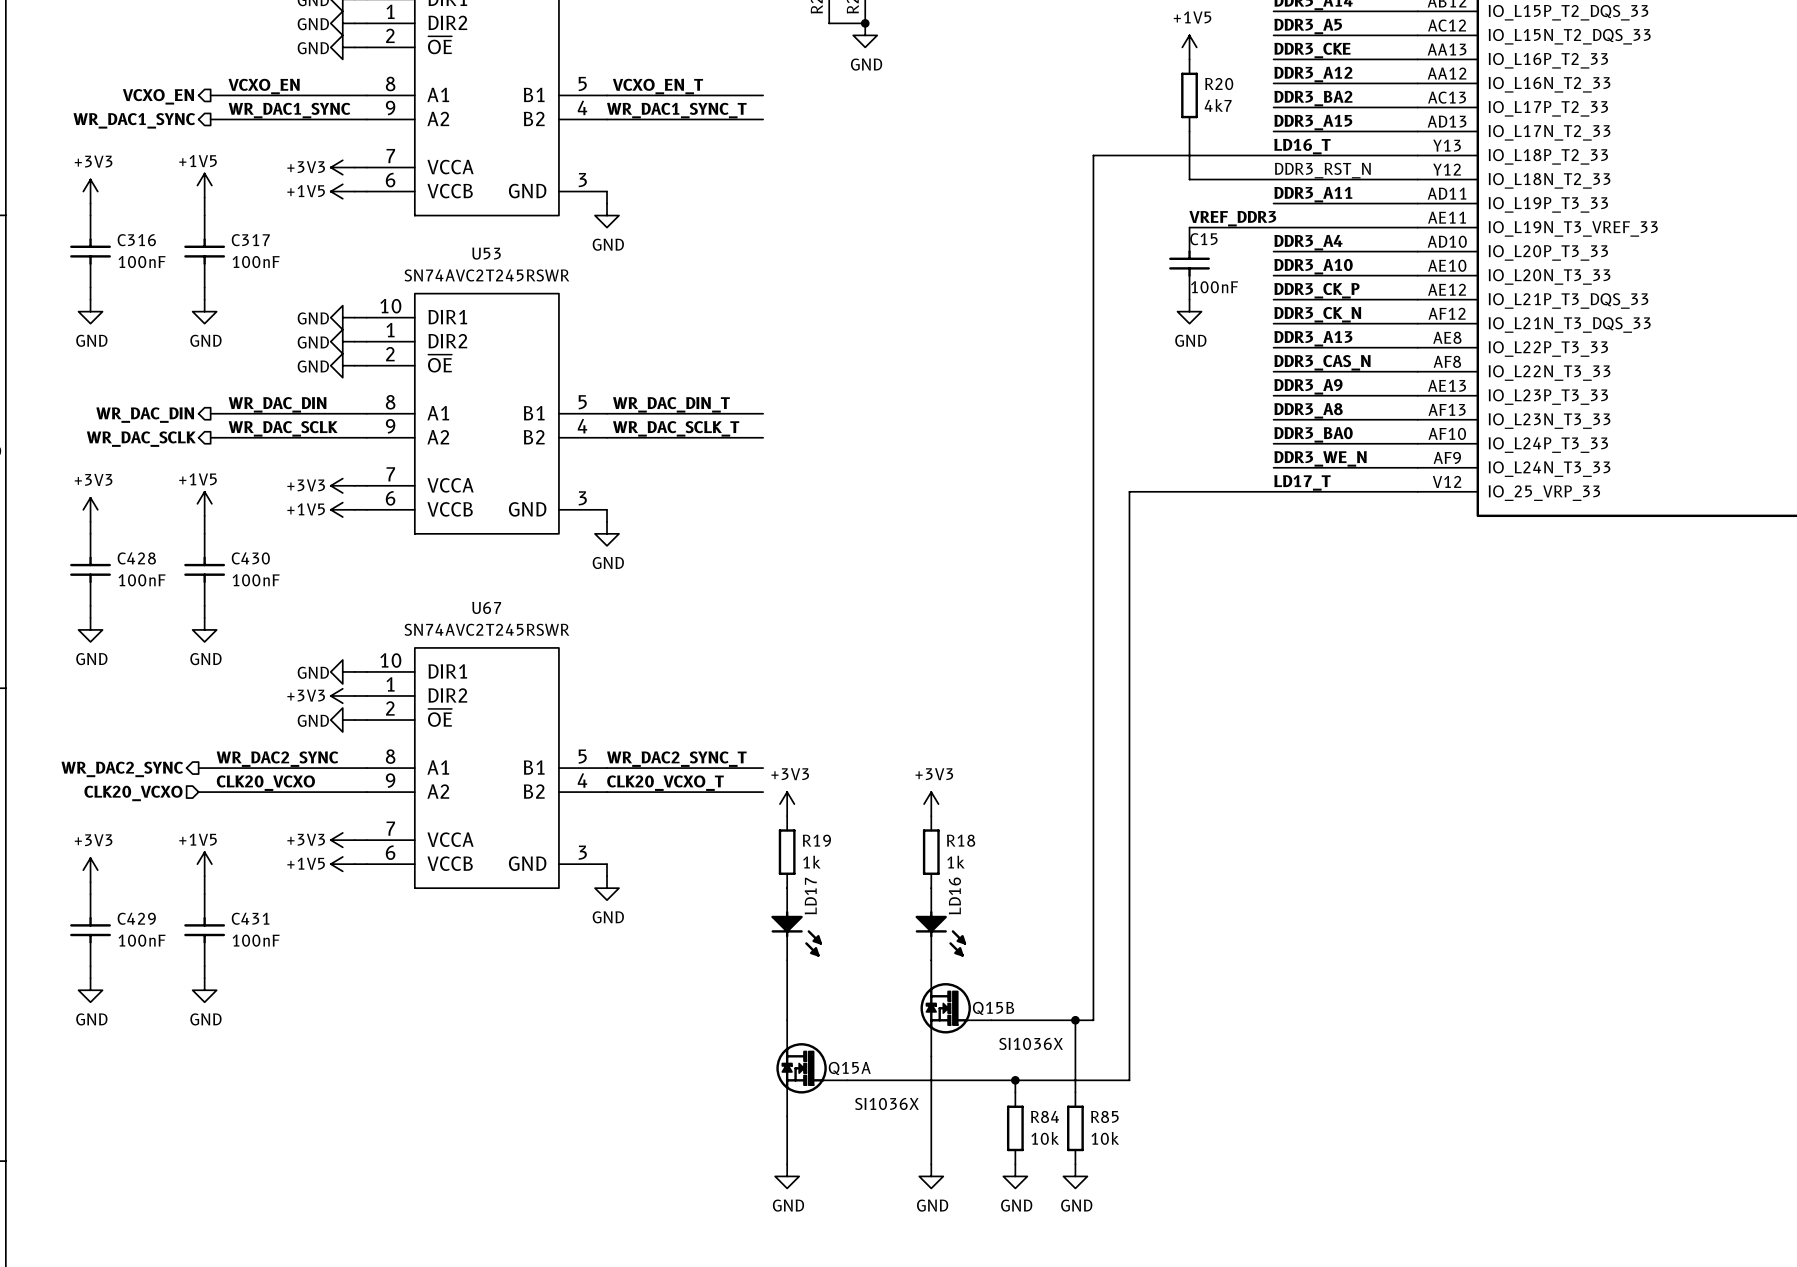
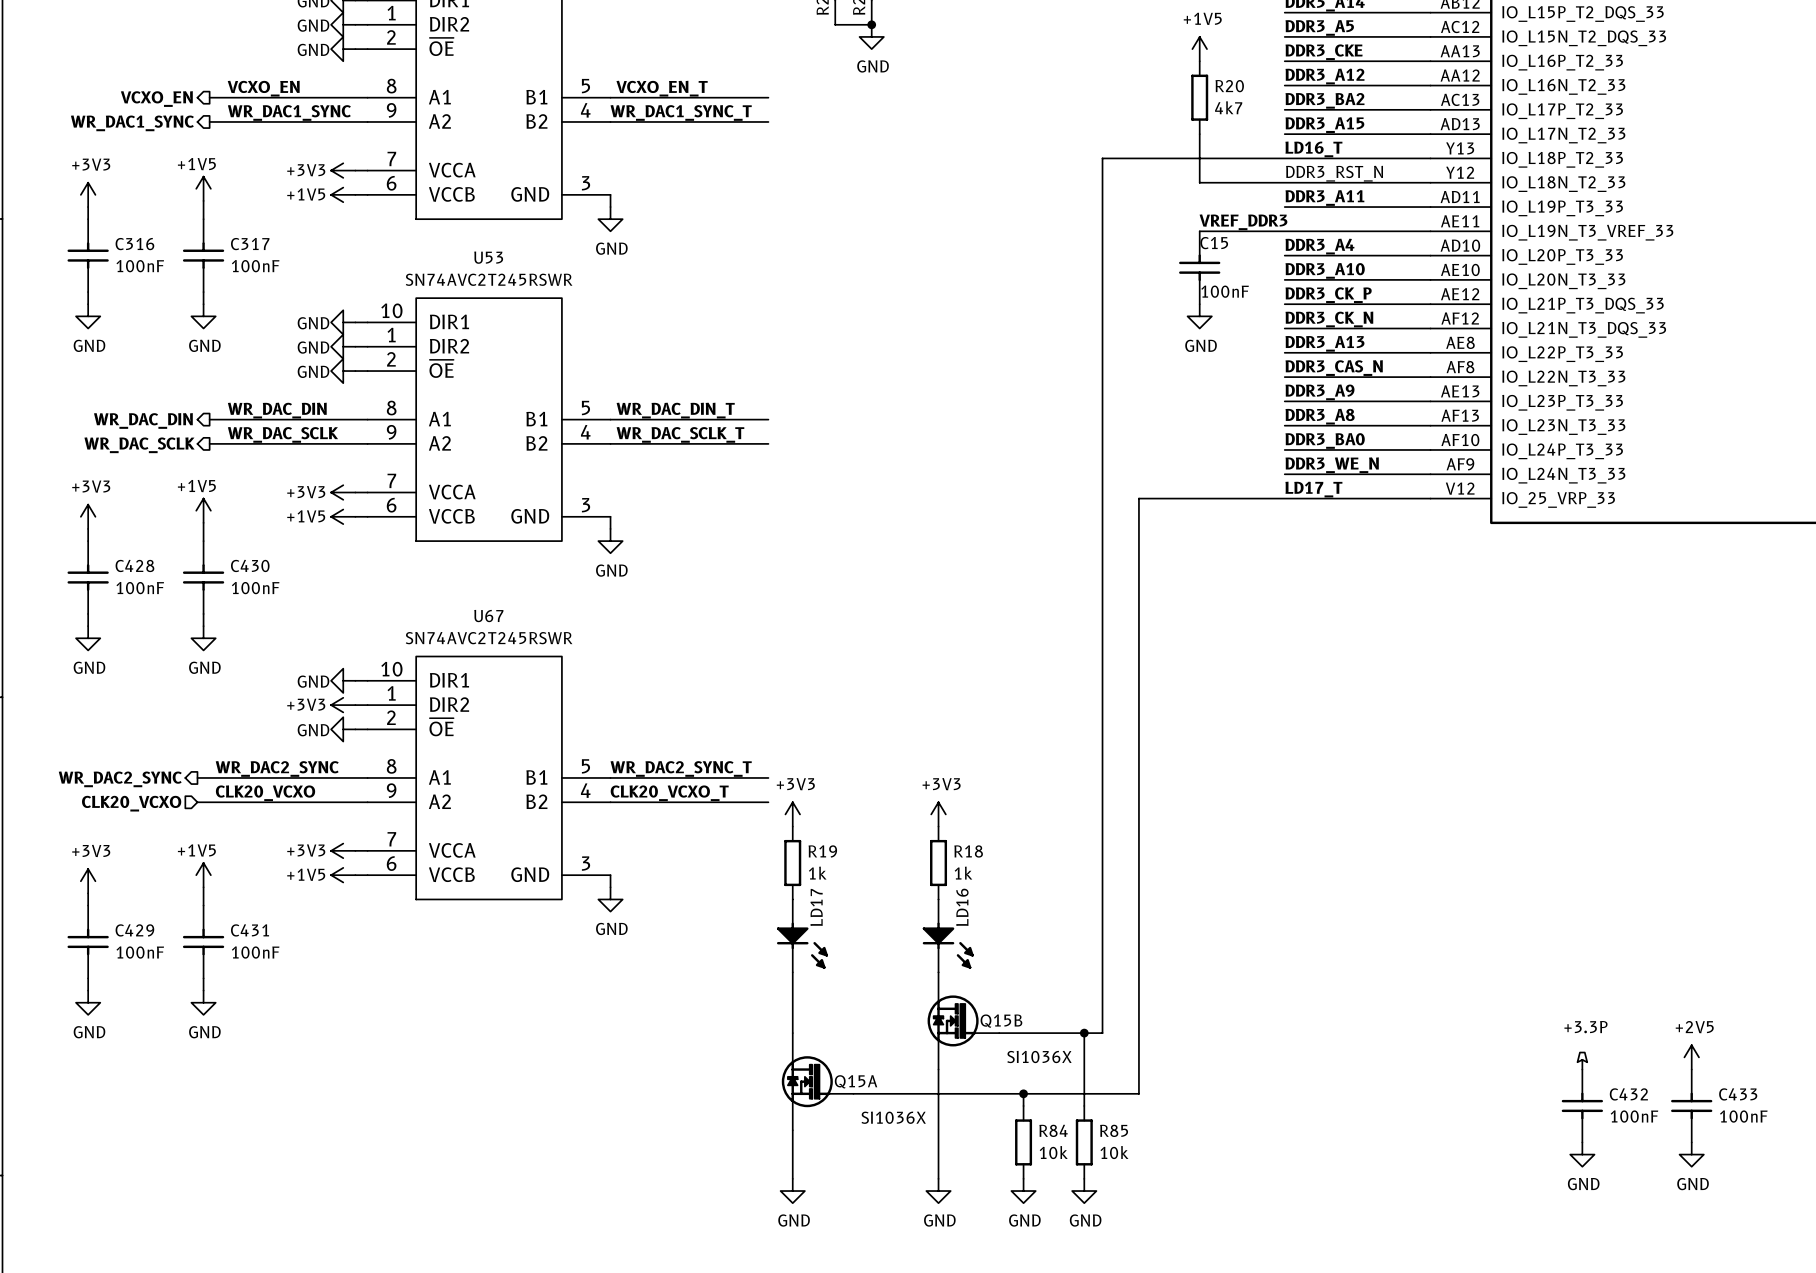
power symbol: none -> +2V5 (1691, 1057)
power symbol: none -> +3.3P (1582, 1061)
C432: none -> (1582, 1105)
C433: none -> (1691, 1105)
power symbol: none -> GND (1582, 1154)
power symbol: none -> GND (1691, 1154)

